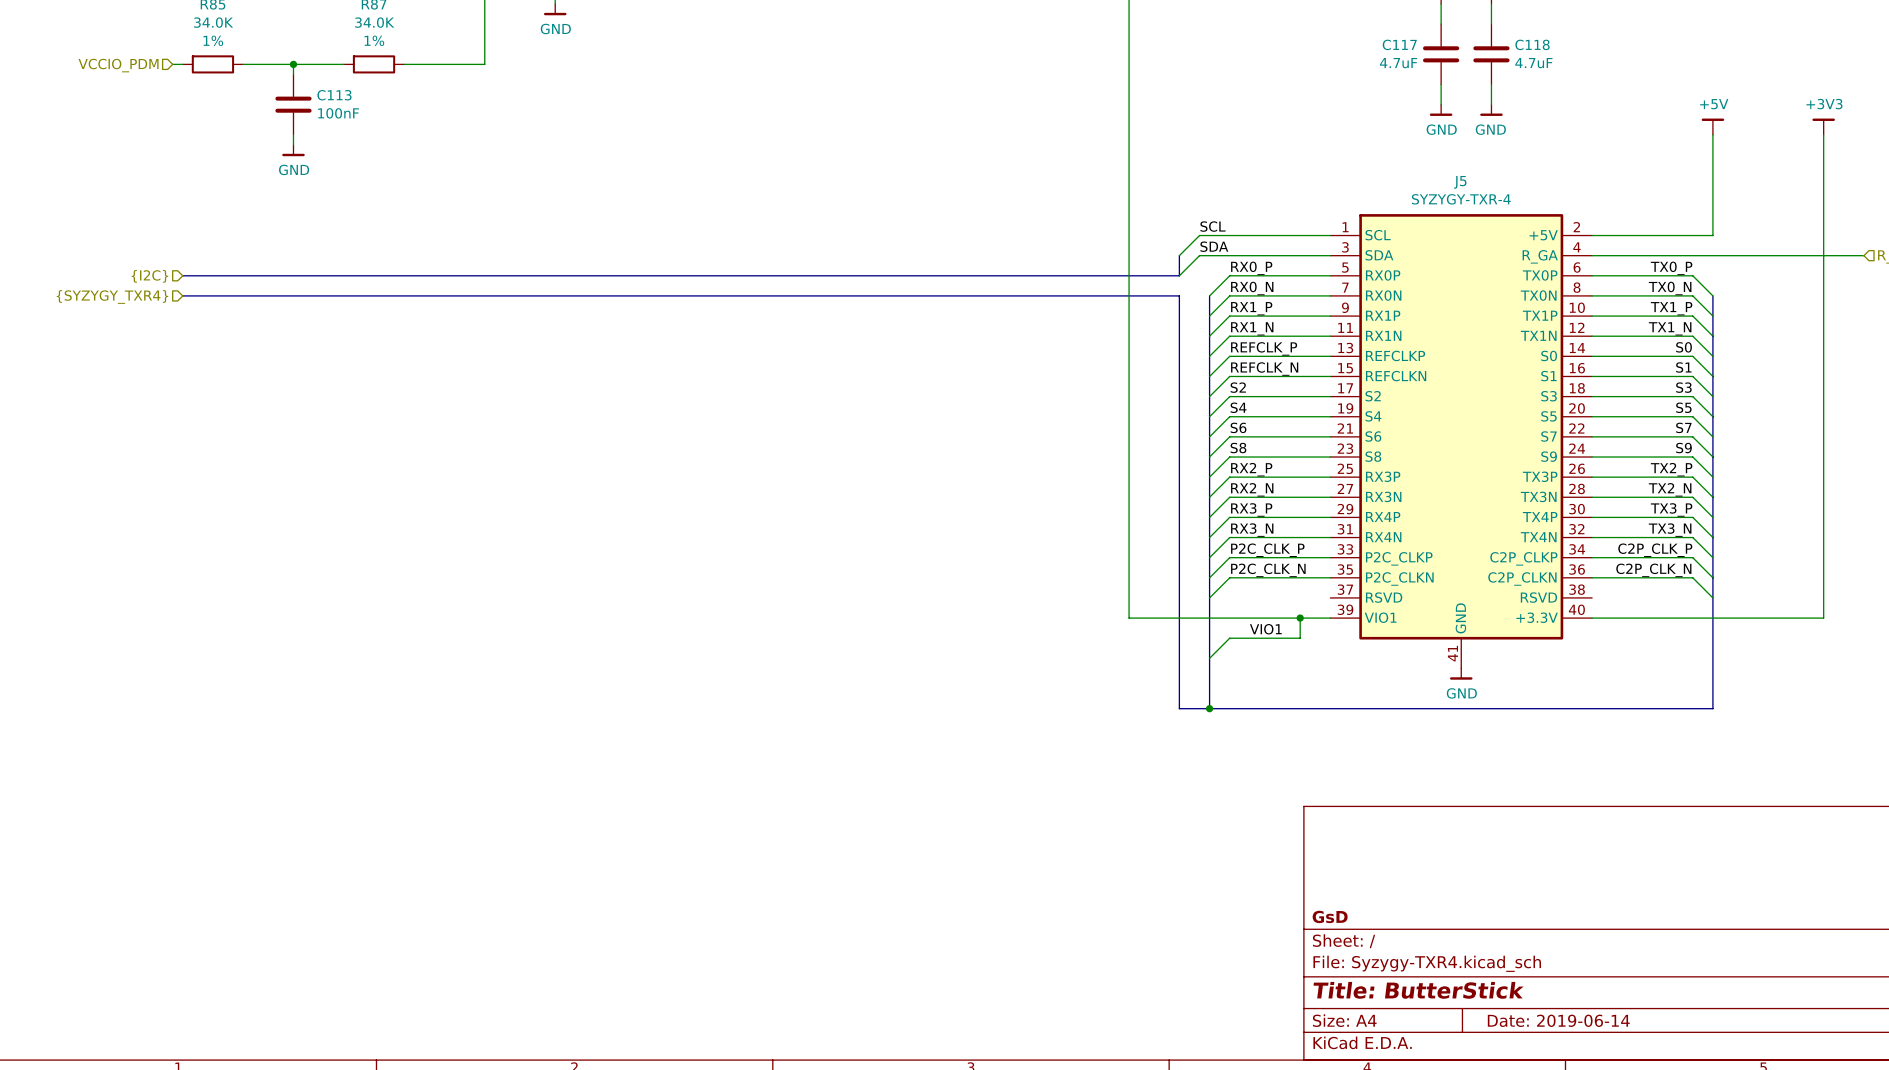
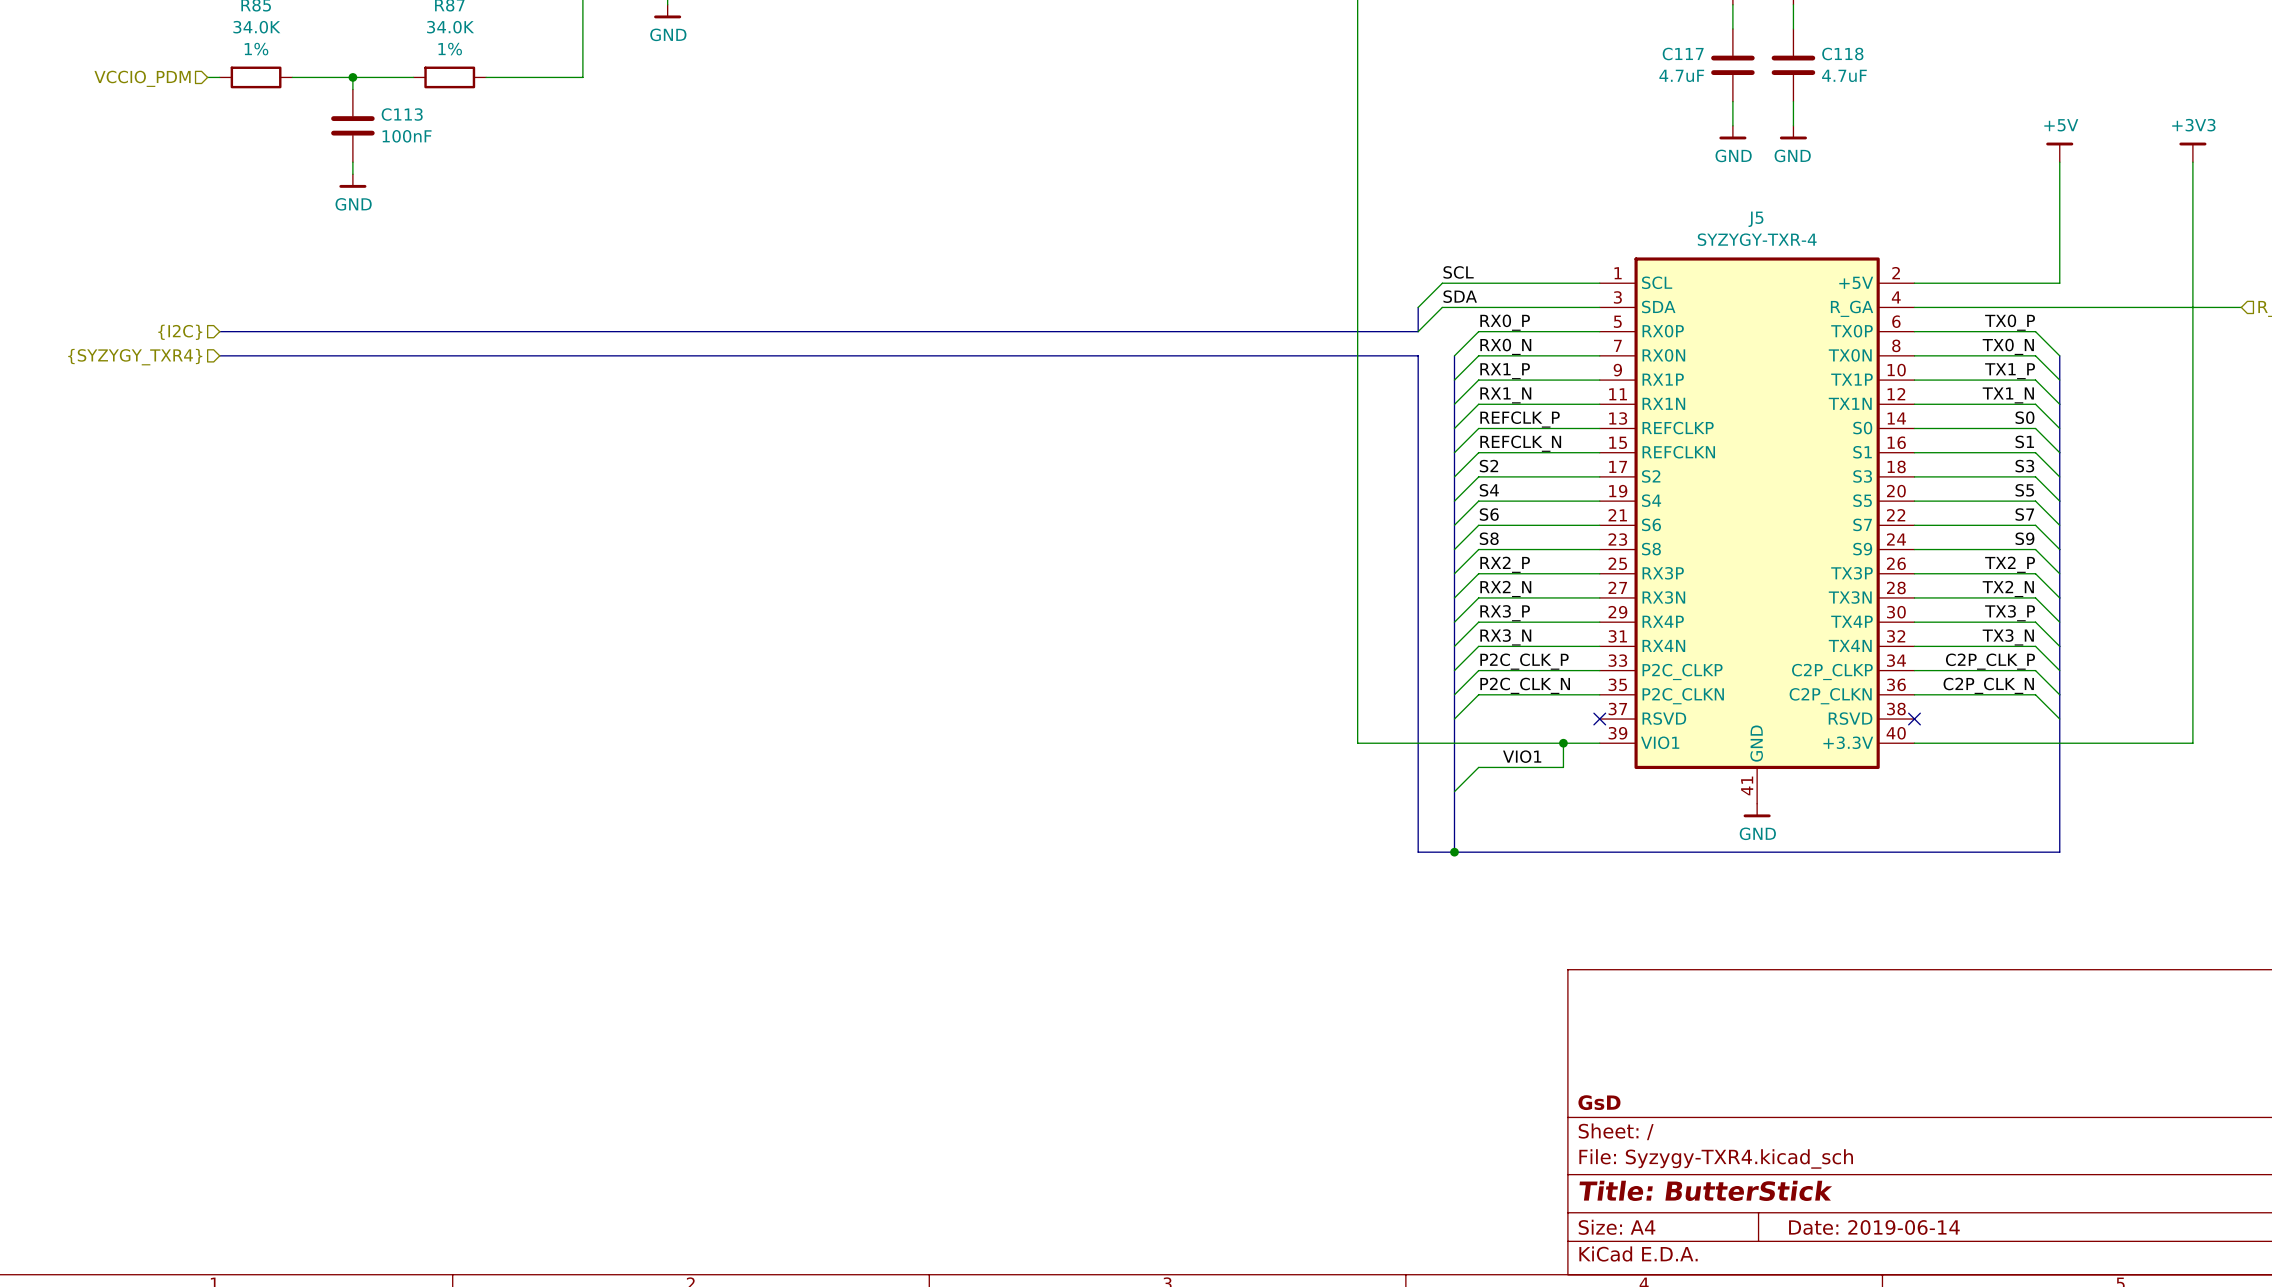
no-connect mark: none -> (1599, 719)
no-connect mark: none -> (1914, 719)

